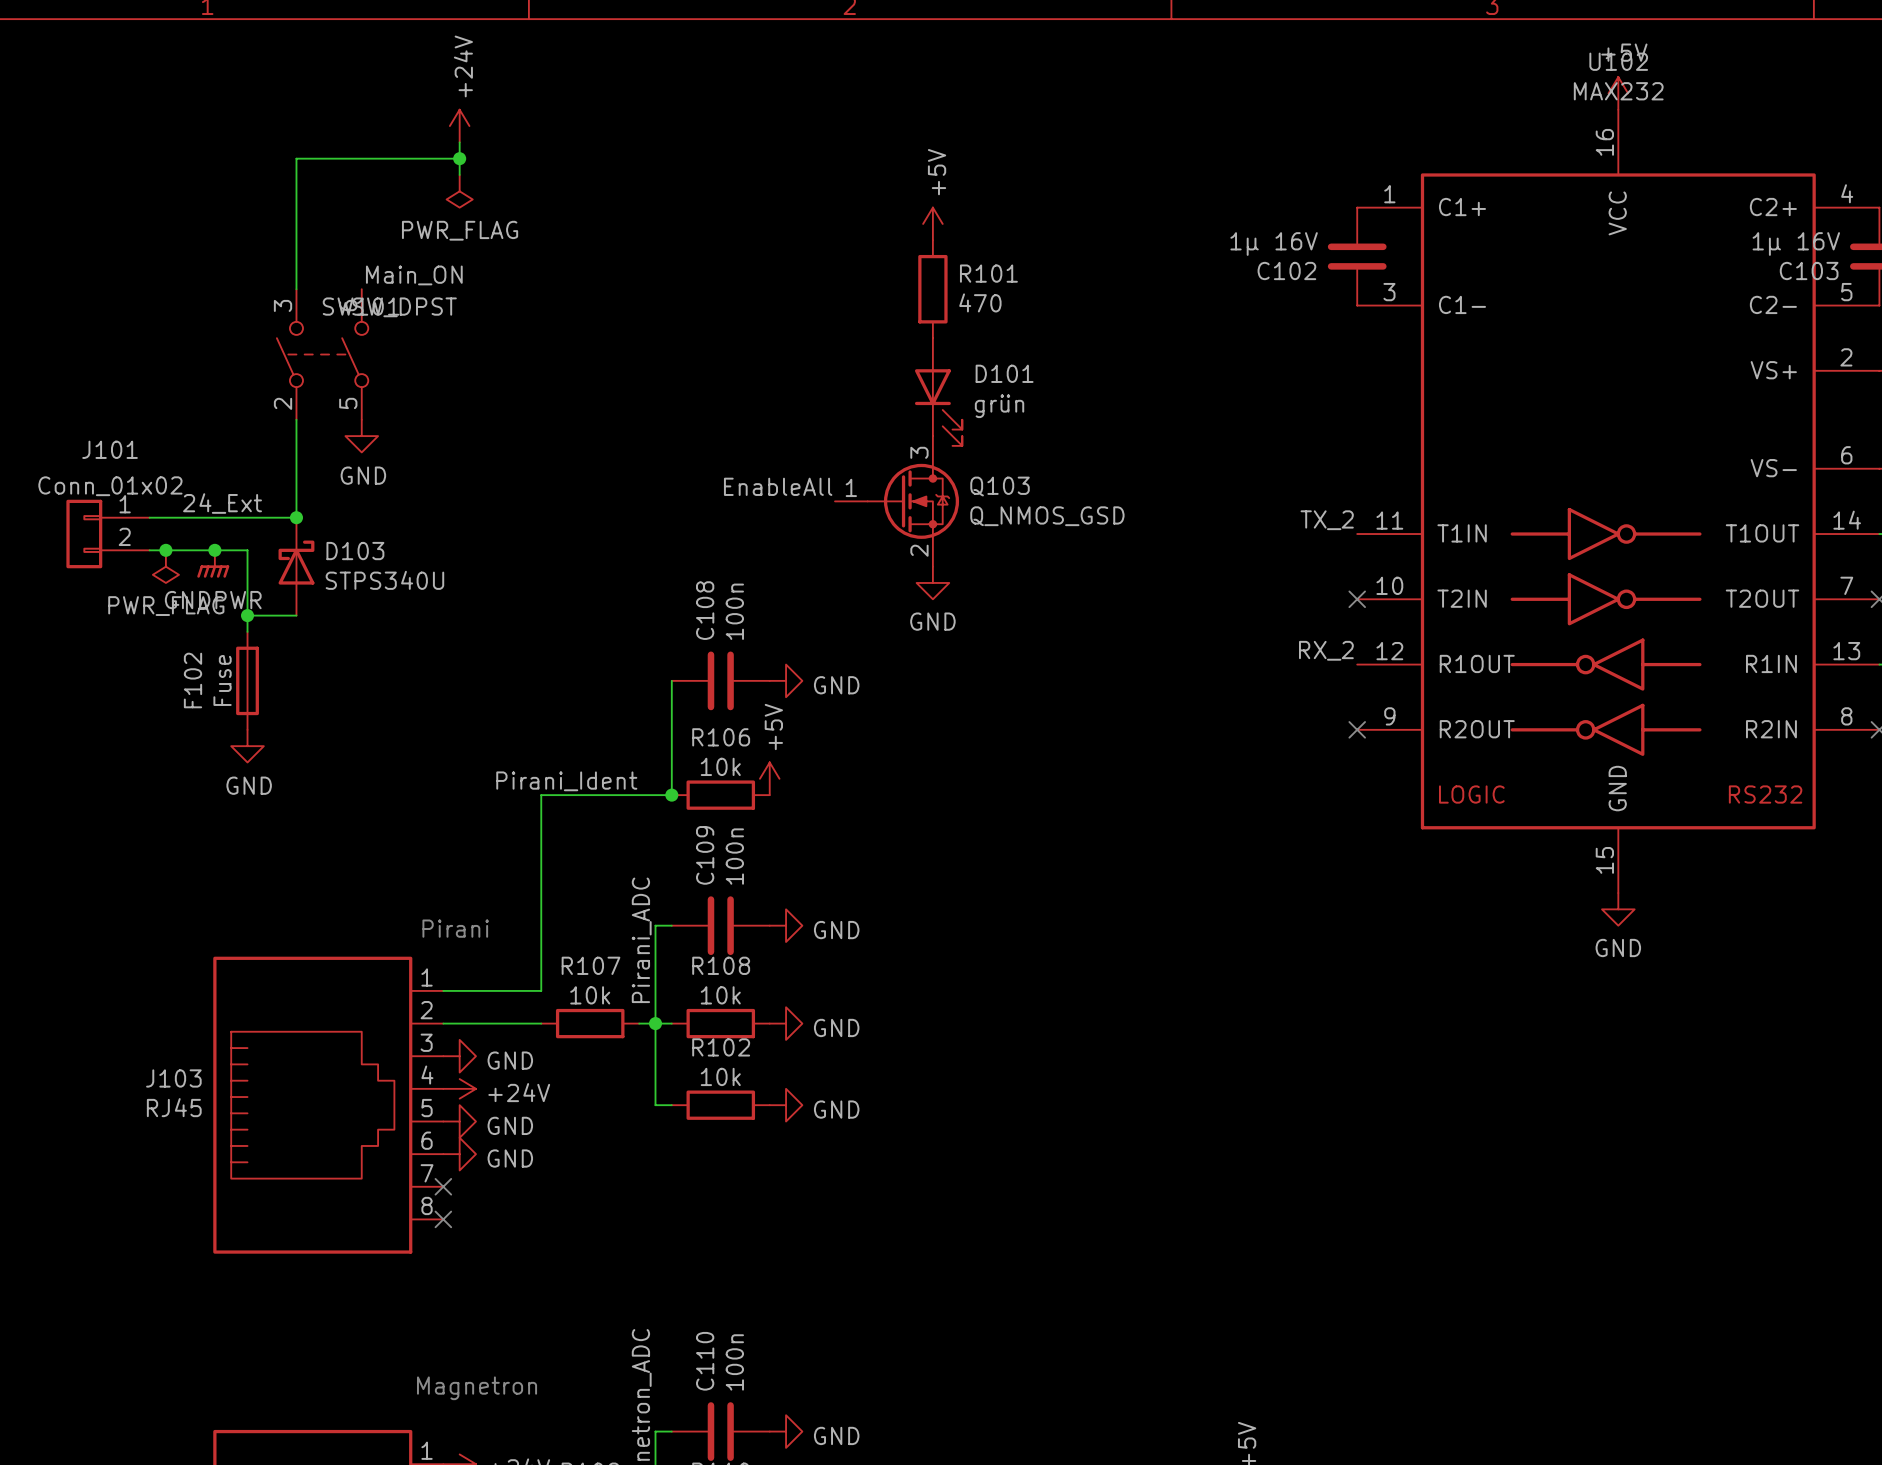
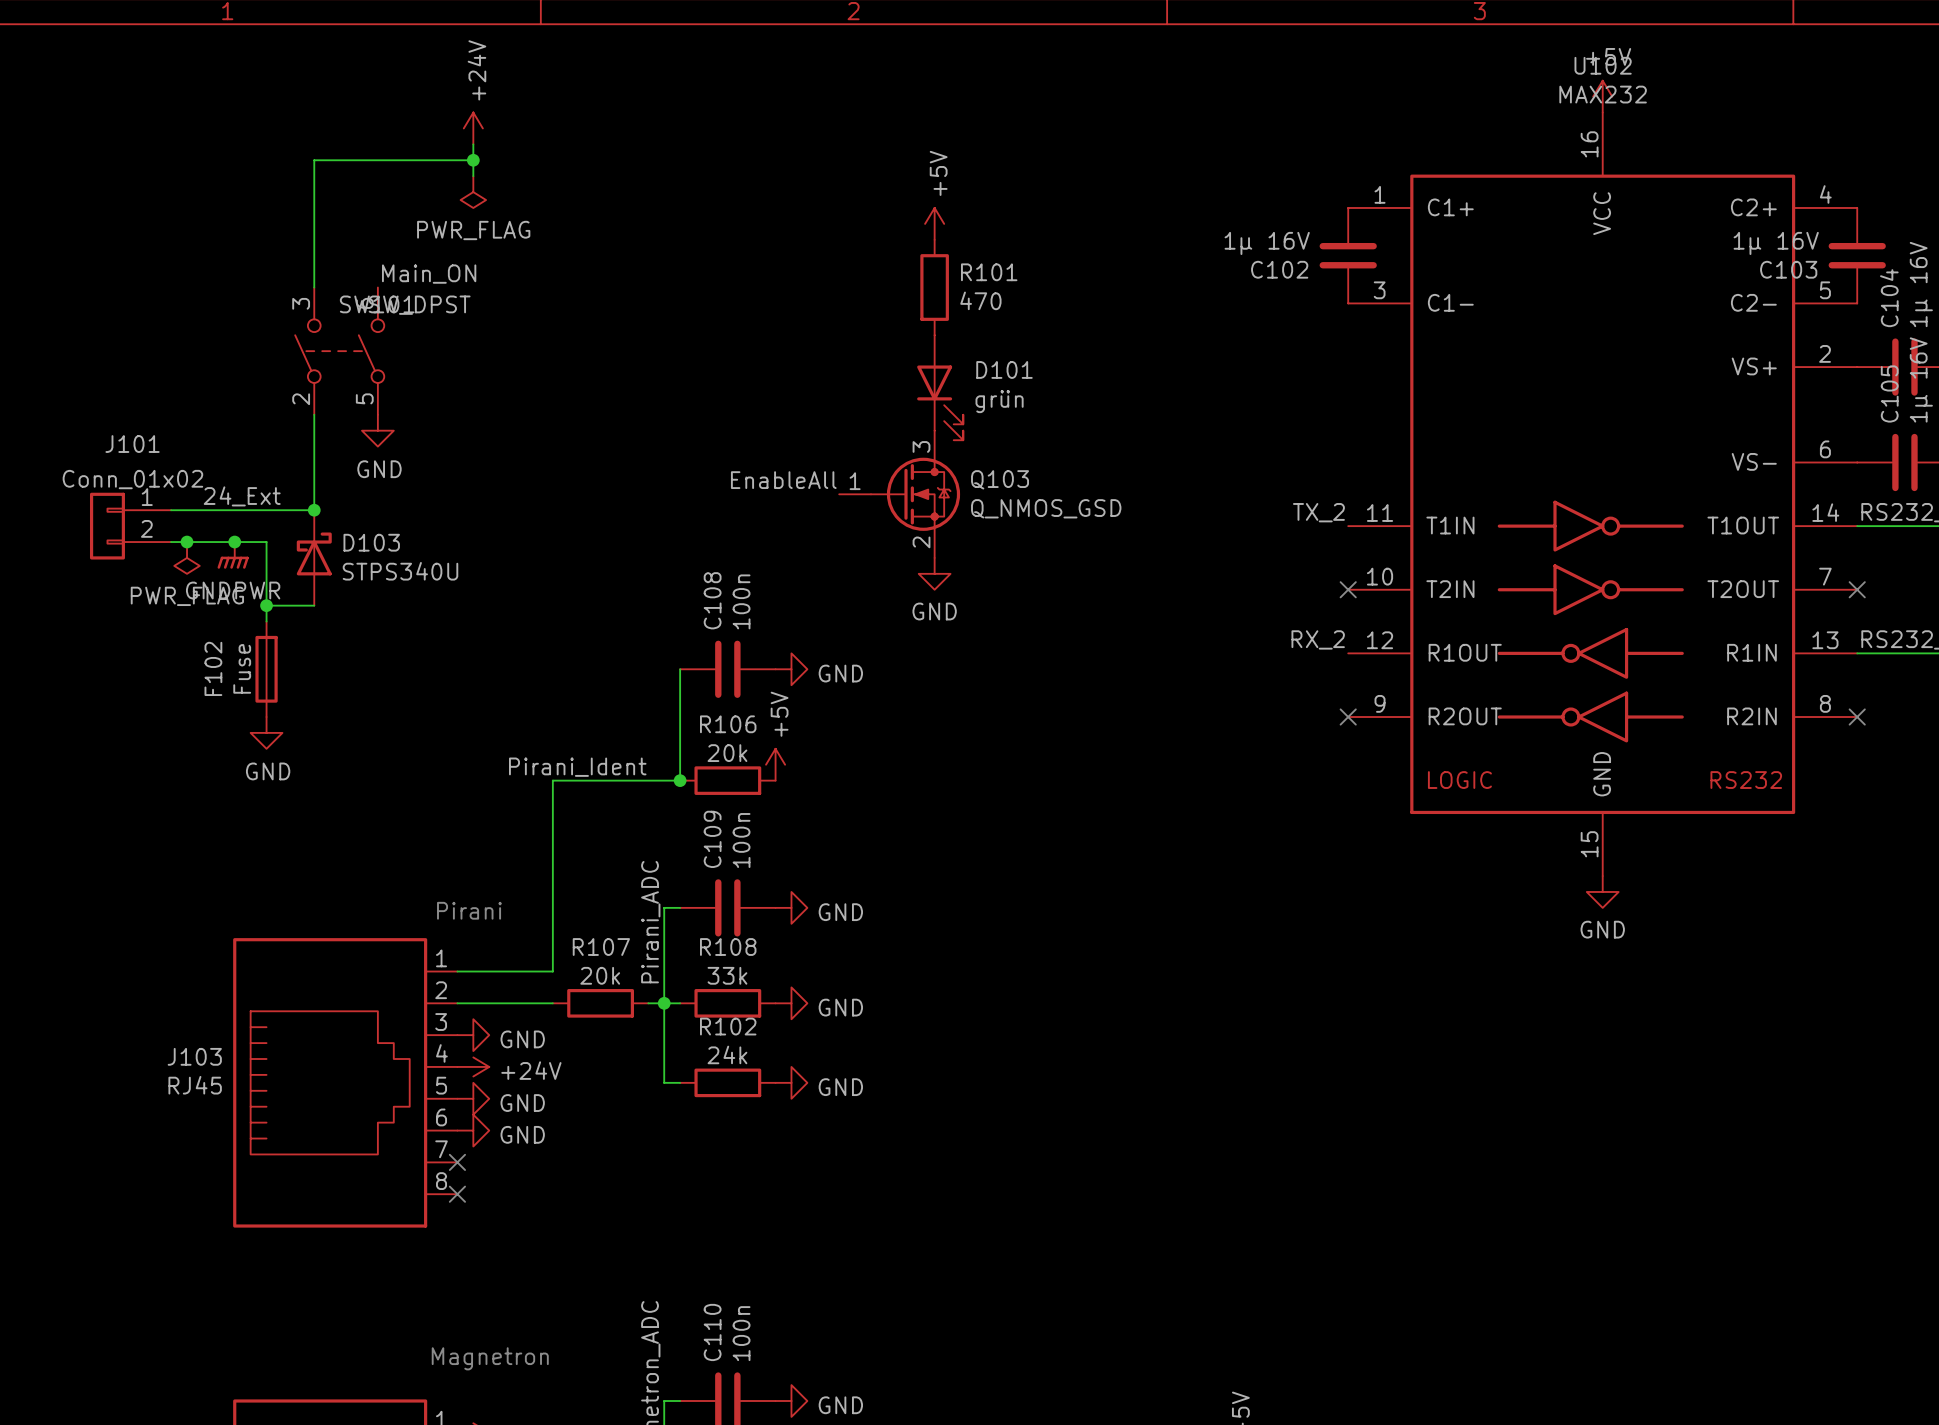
R106 value: 10k (720, 766) -> 20k (727, 753)
R107 value: 10k (590, 995) -> 20k (600, 975)
R108 value: 10k (720, 995) -> 33k (727, 975)
R102 value: 10k (720, 1076) -> 24k (727, 1054)

